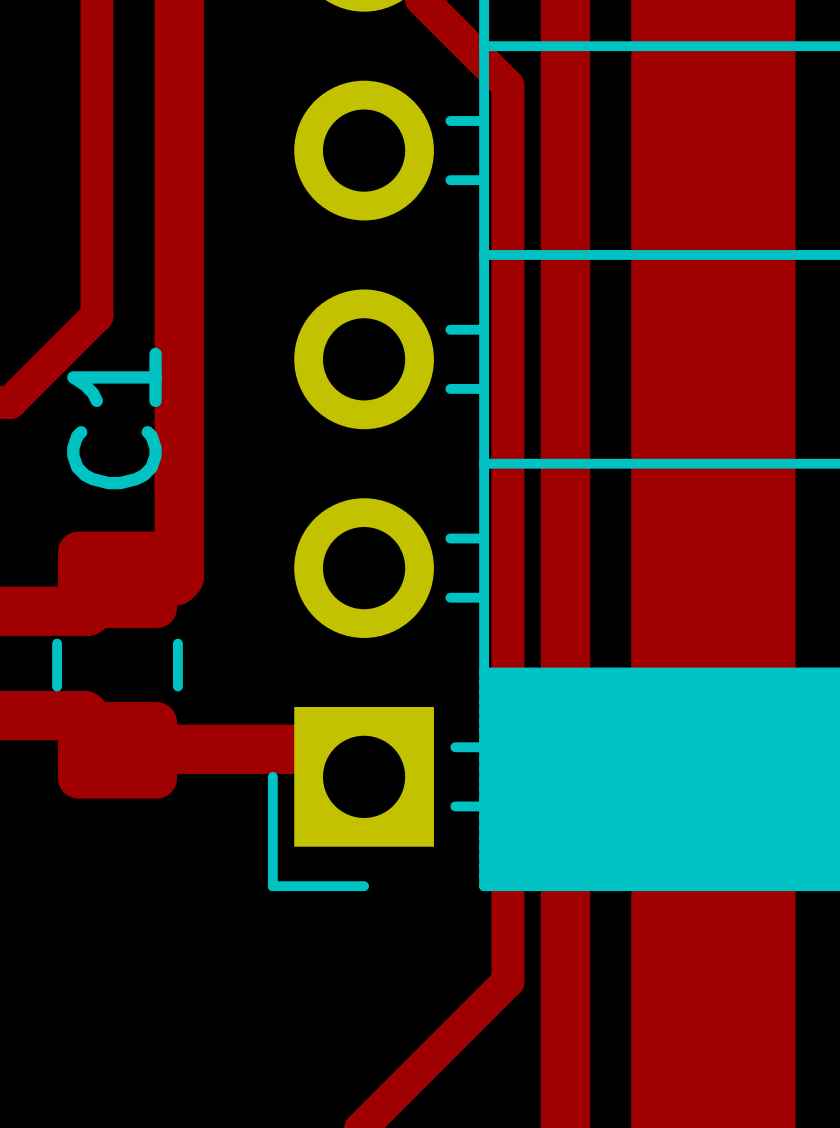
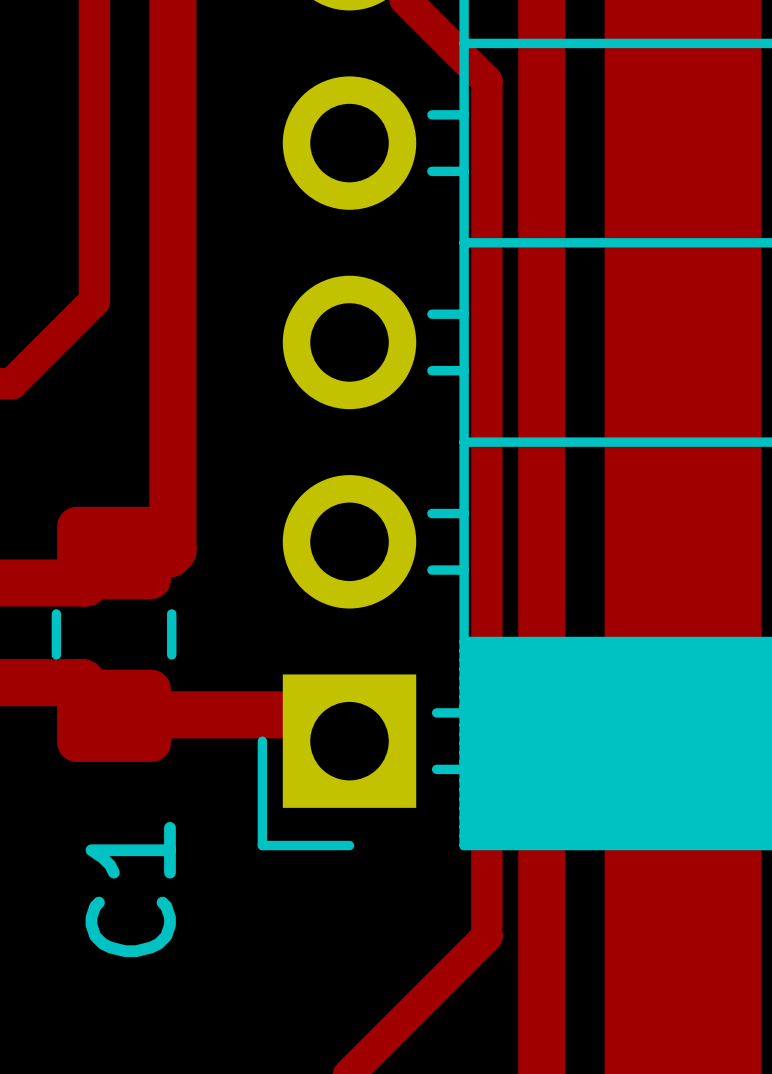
C1 name position: C1 (114, 418) -> C1 (130, 889)

